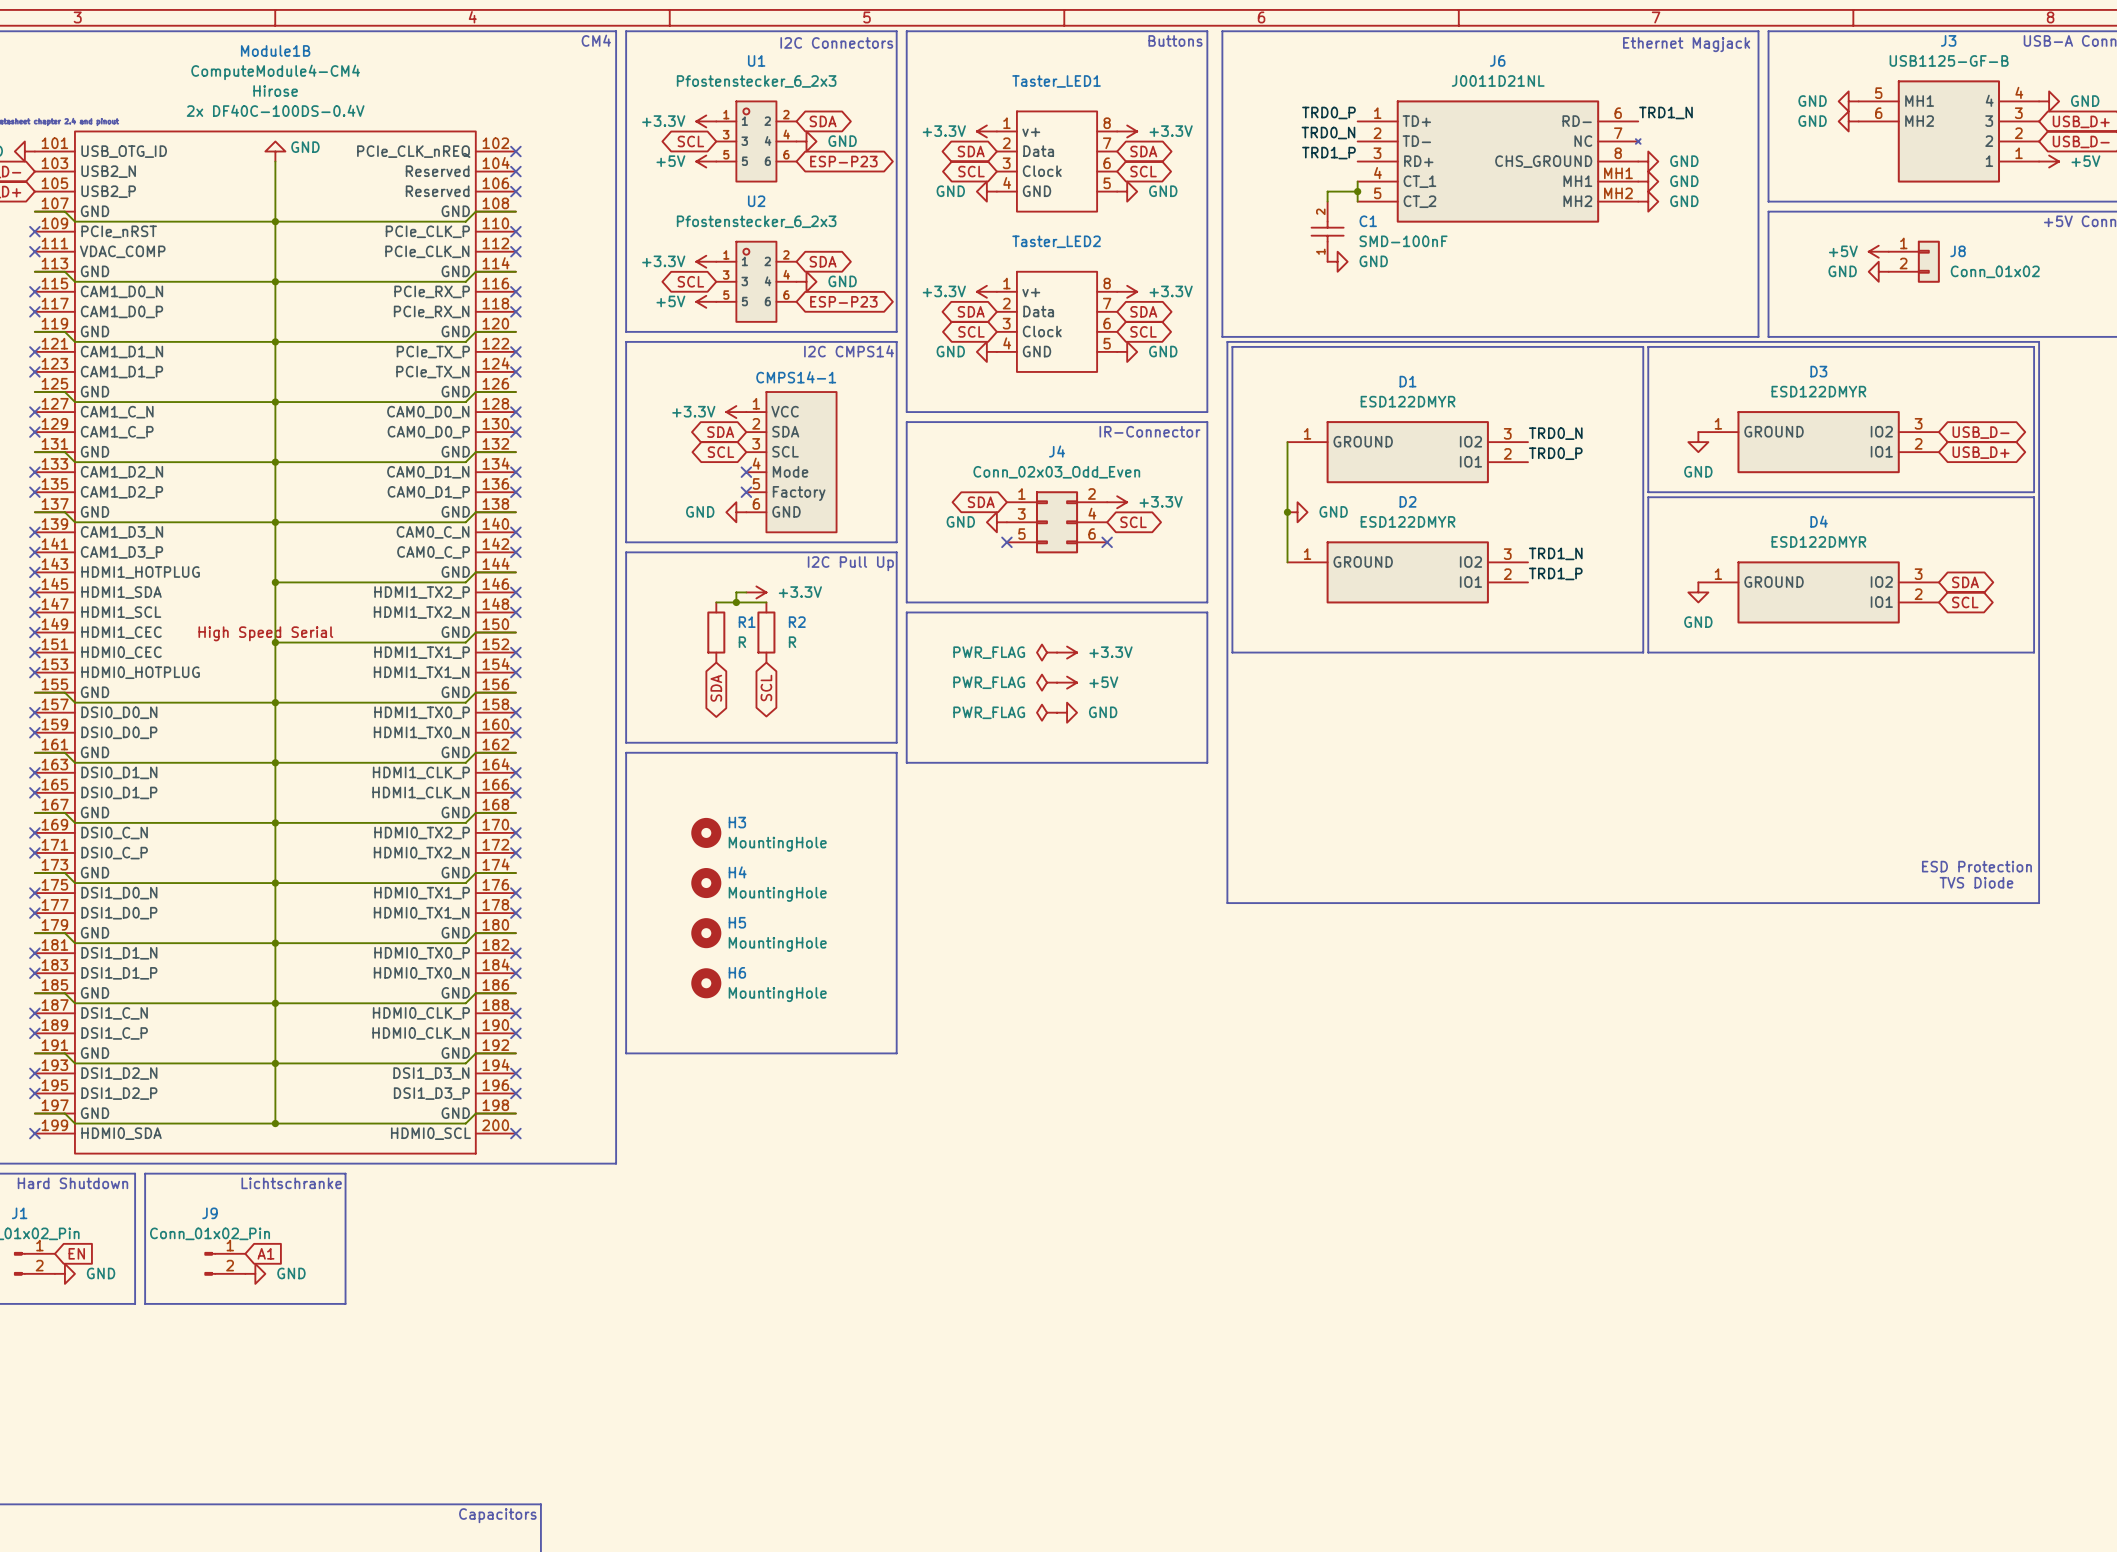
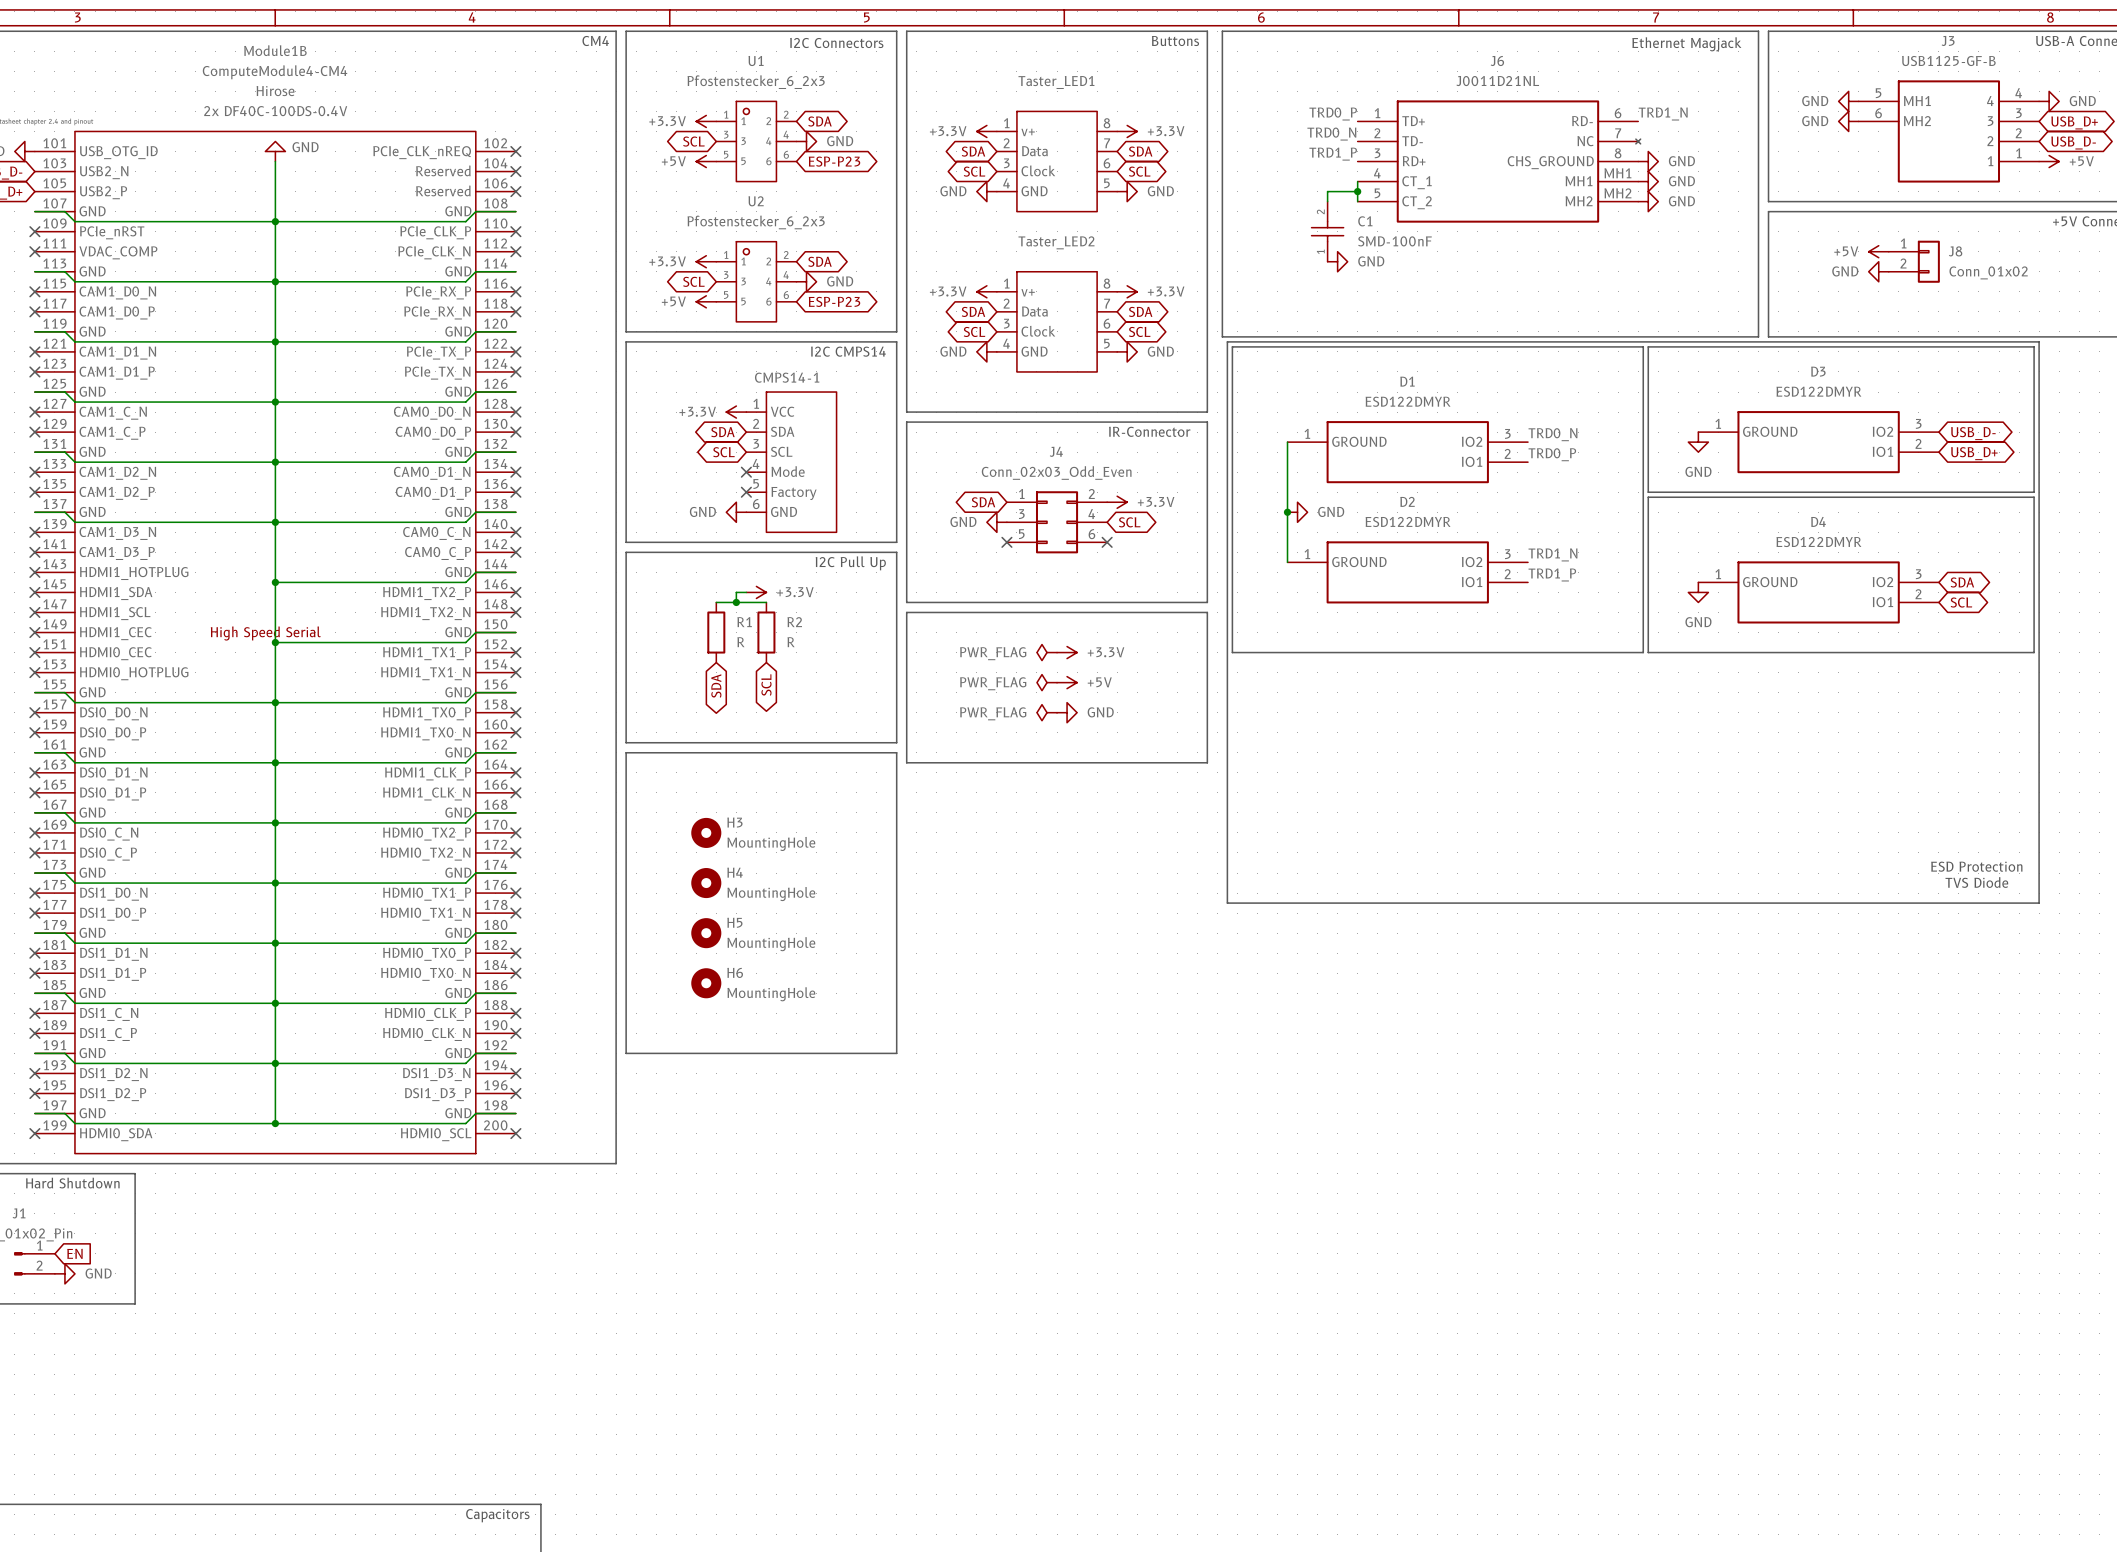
line: (145, 1173) (345, 1173) (345, 1303) (145, 1303) (145, 1173) -> none
text: Lichtschranke (291, 1183) -> none
global label: A1 (265, 1253) -> none
J9: Conn_01x02_Pin (224, 1263) -> none
power symbol: GND (255, 1273) -> none

